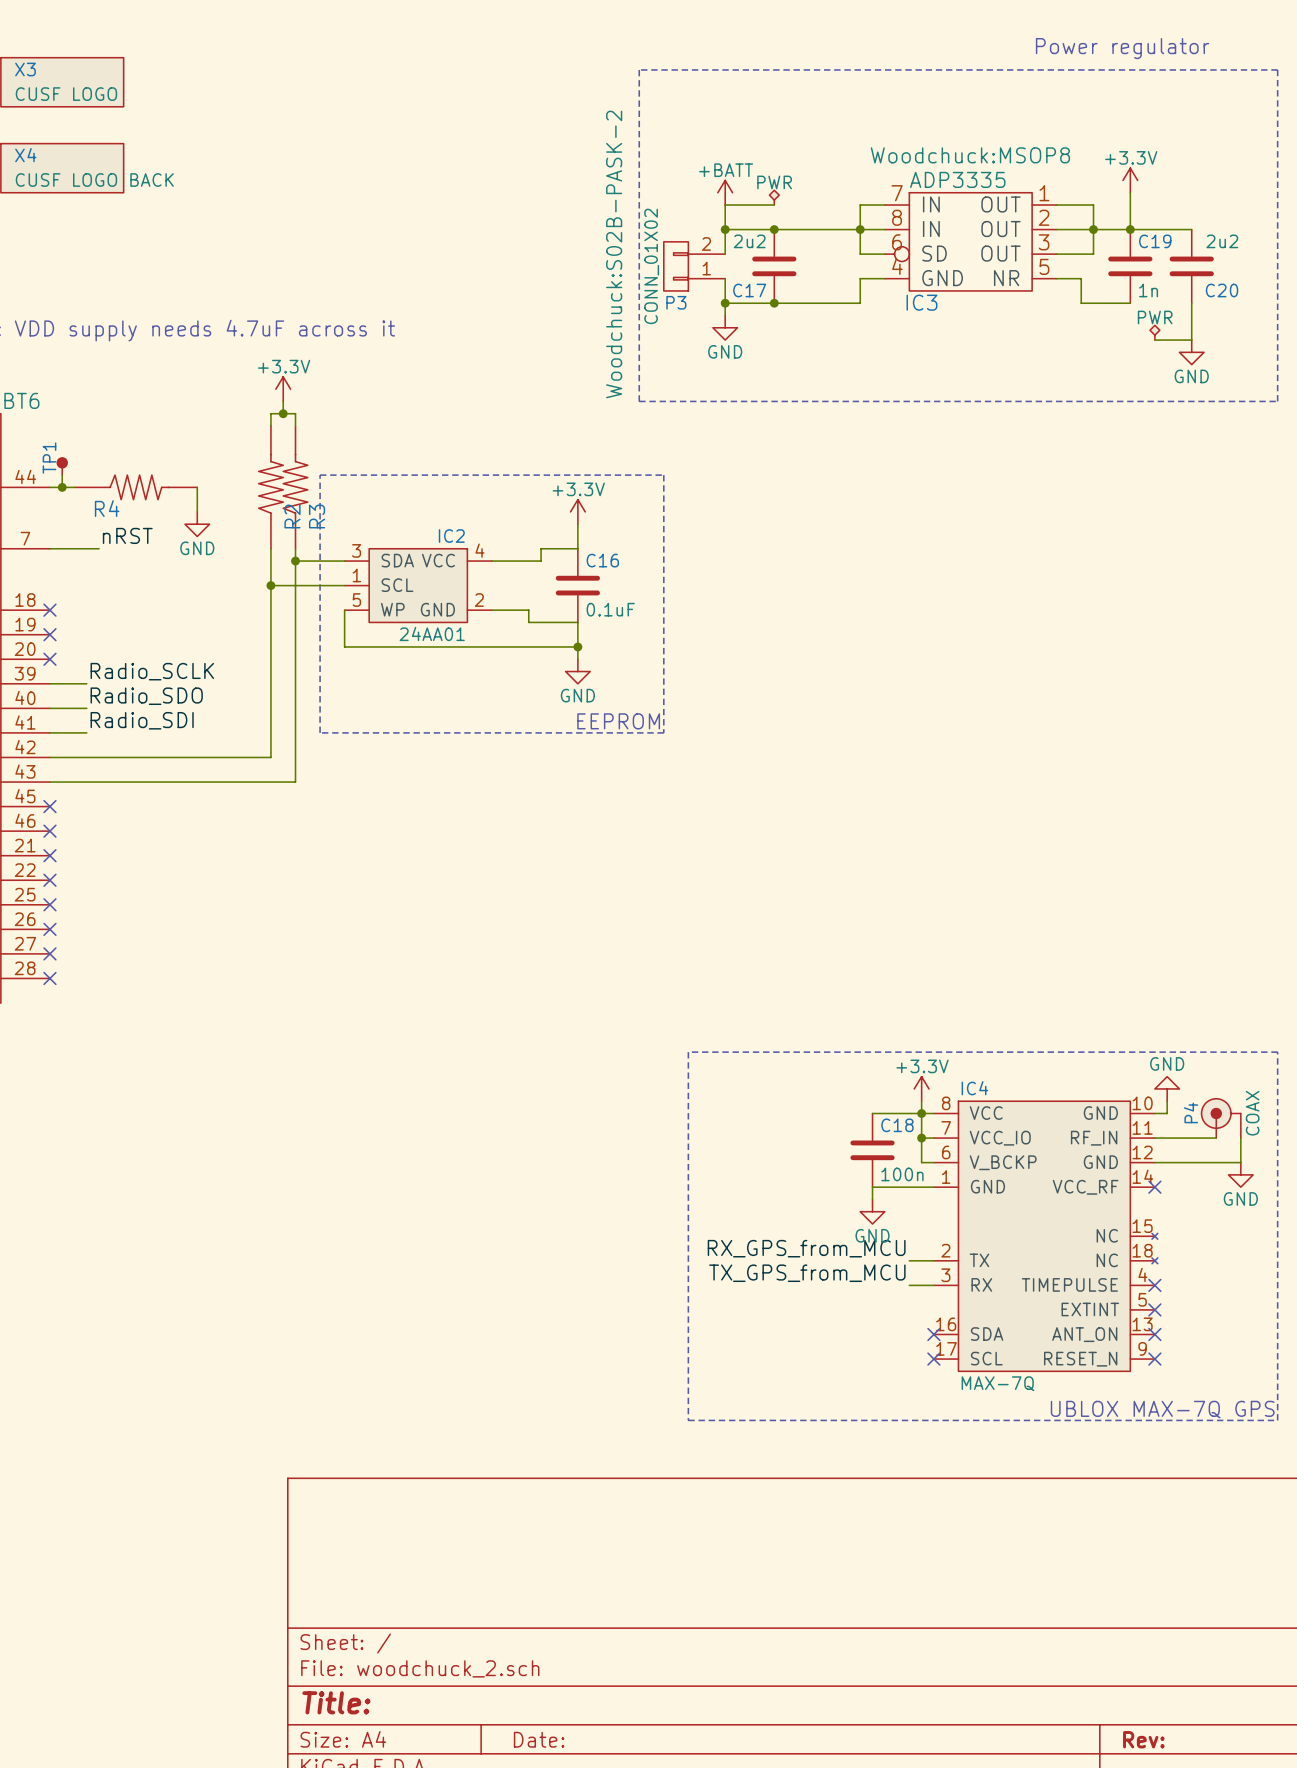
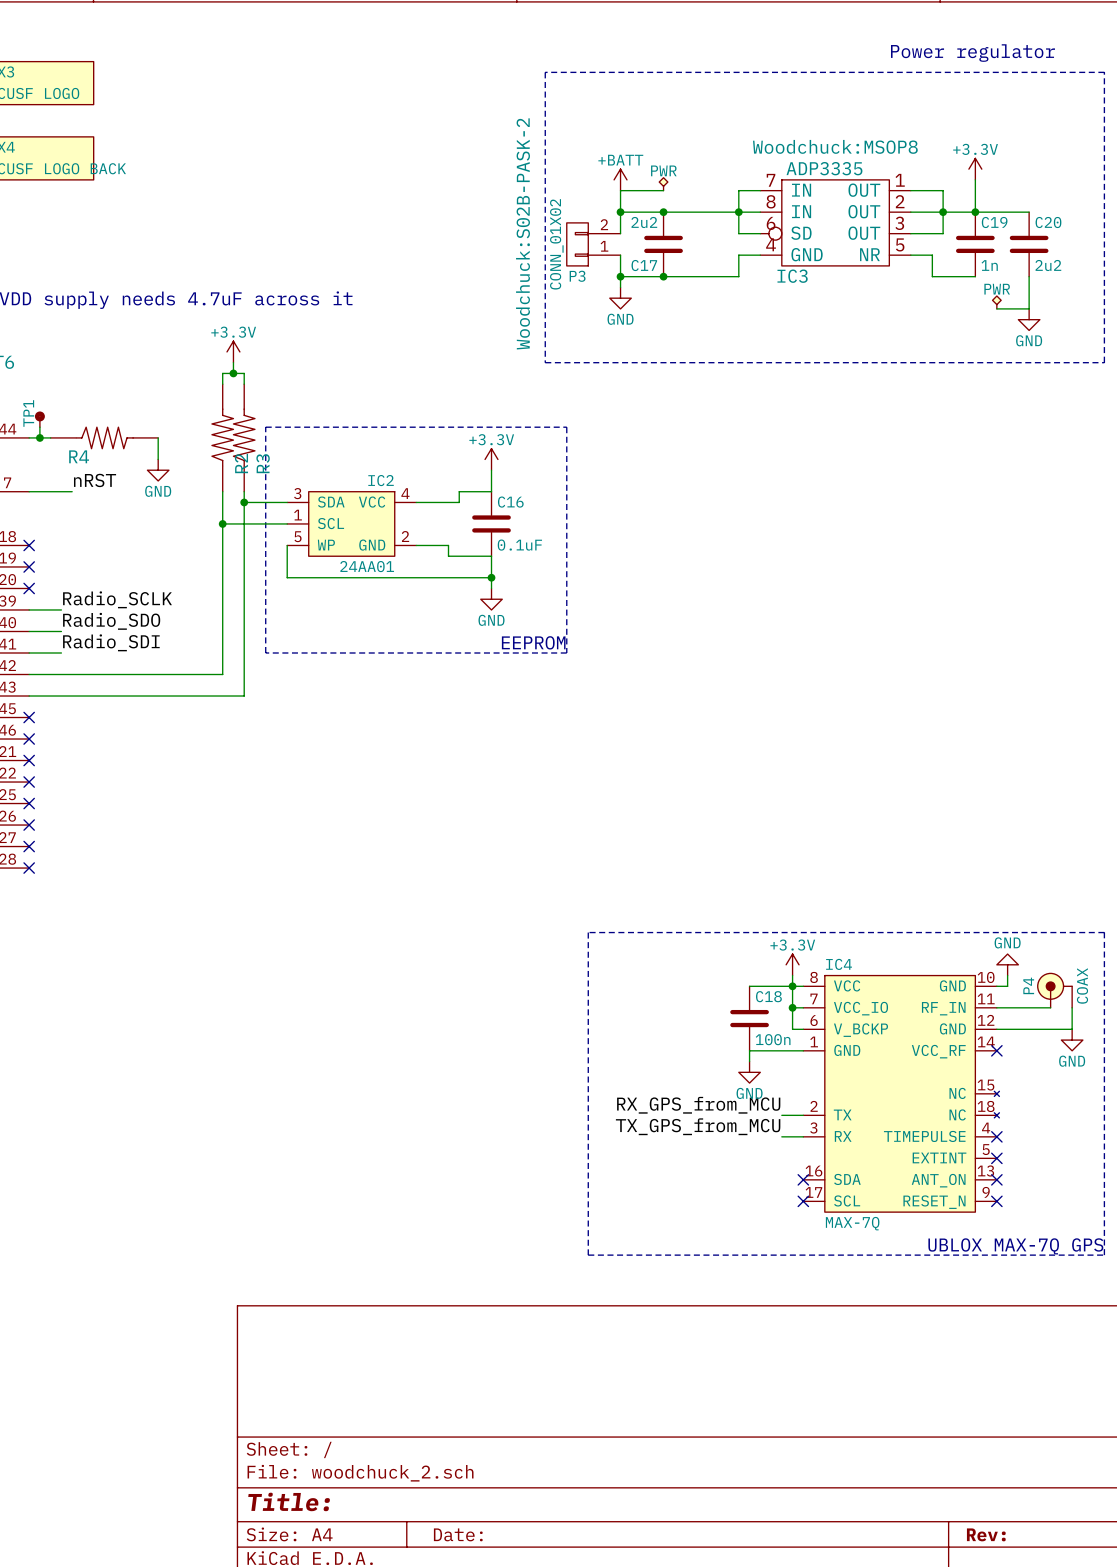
C20 value position: 2u2 (1222, 241) -> 2u2 (1048, 265)
C20 name position: C20 (1222, 290) -> C20 (1048, 222)

